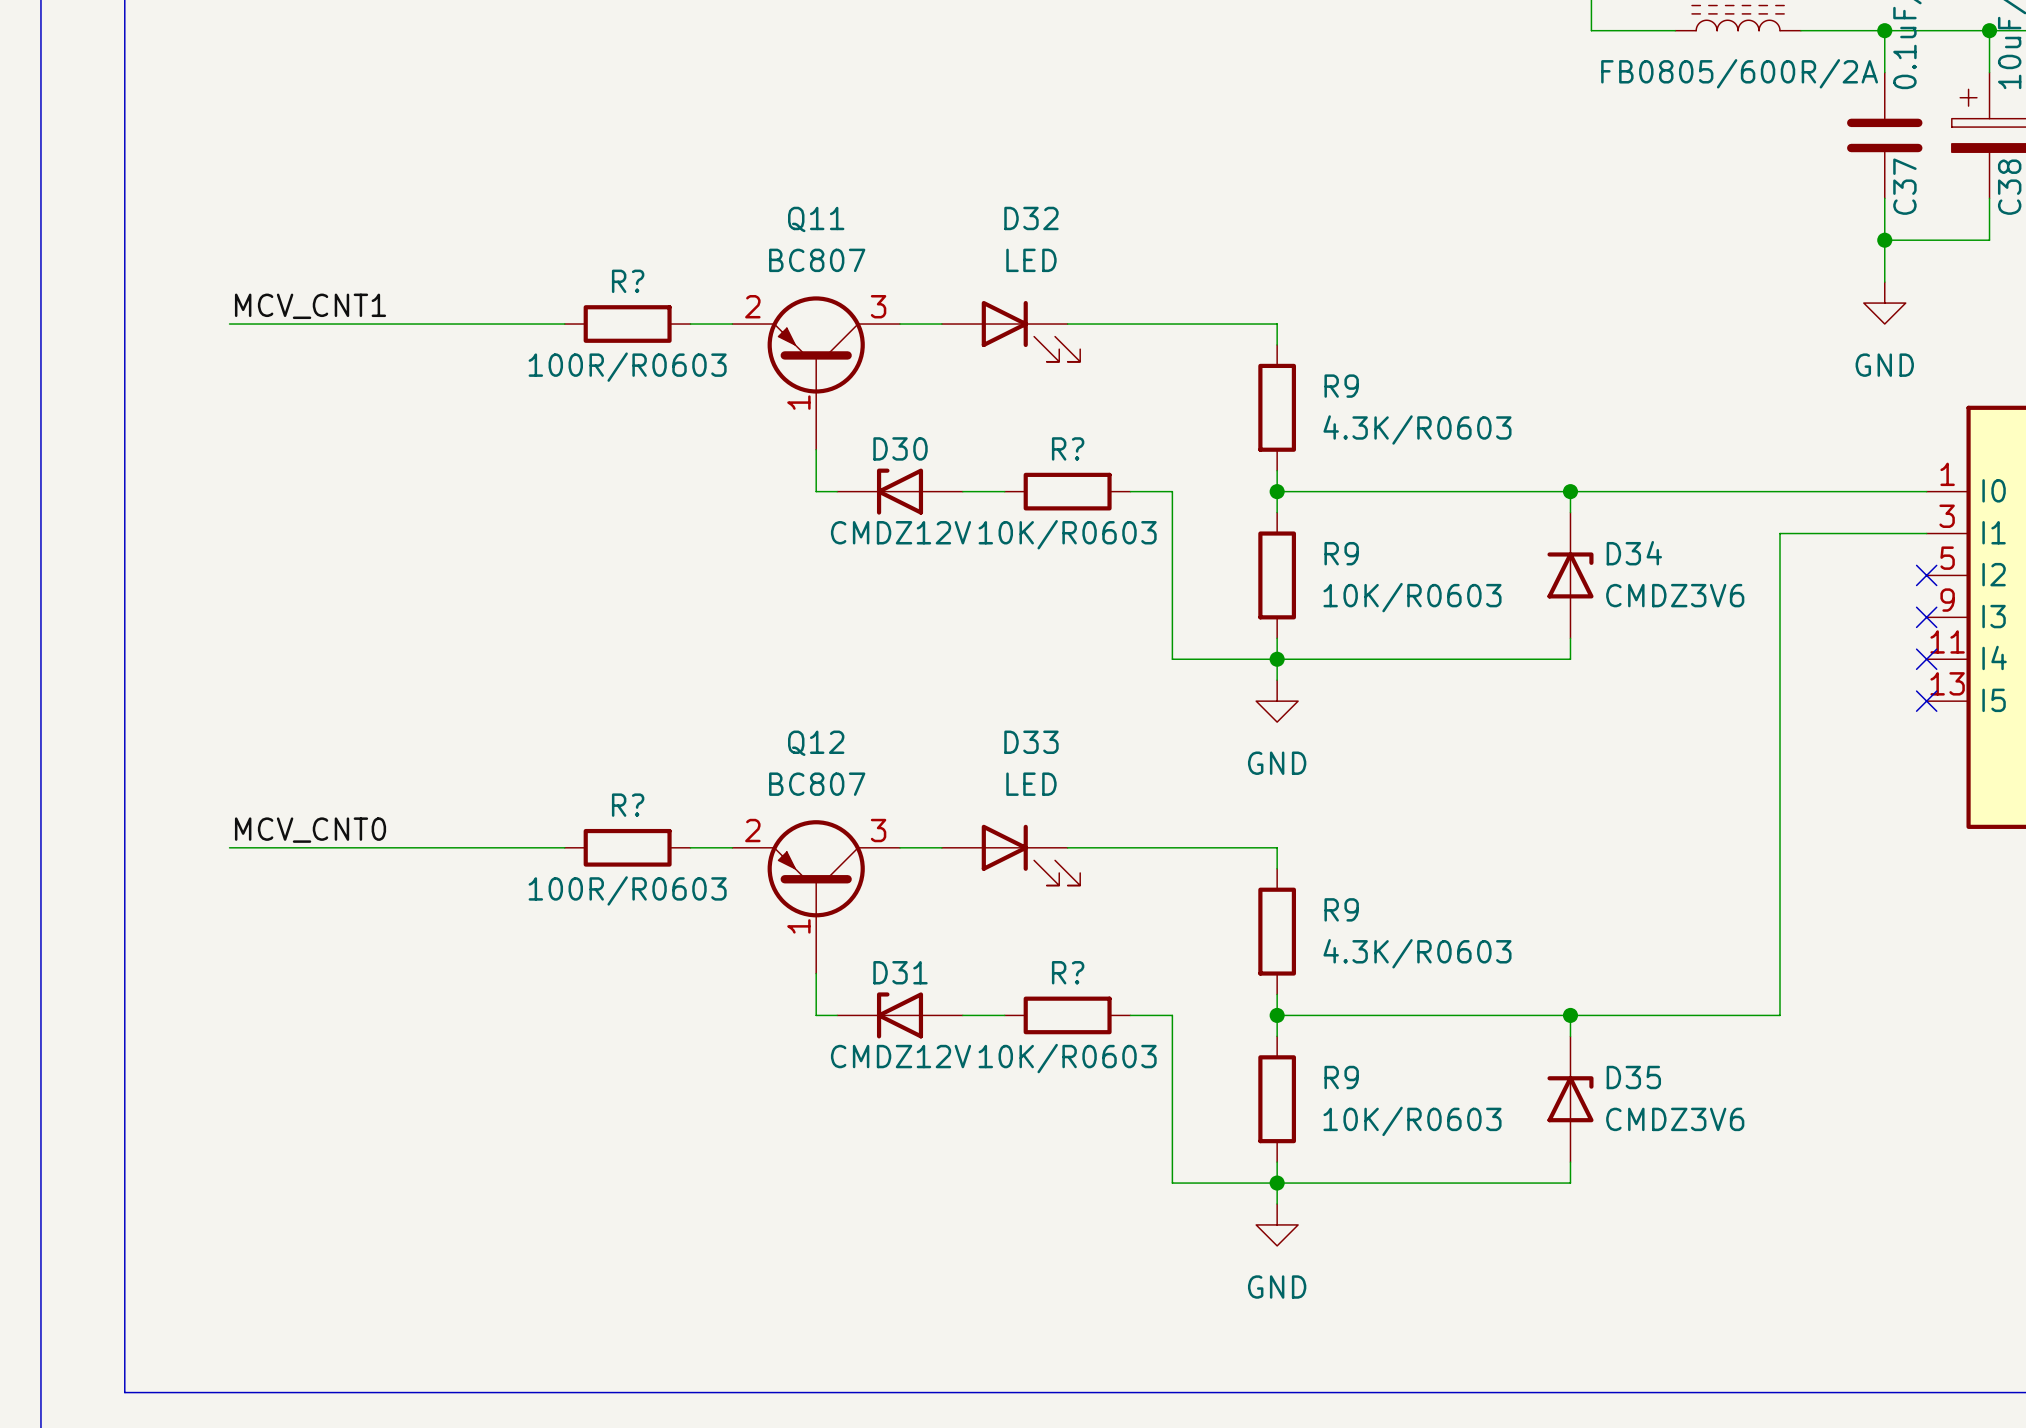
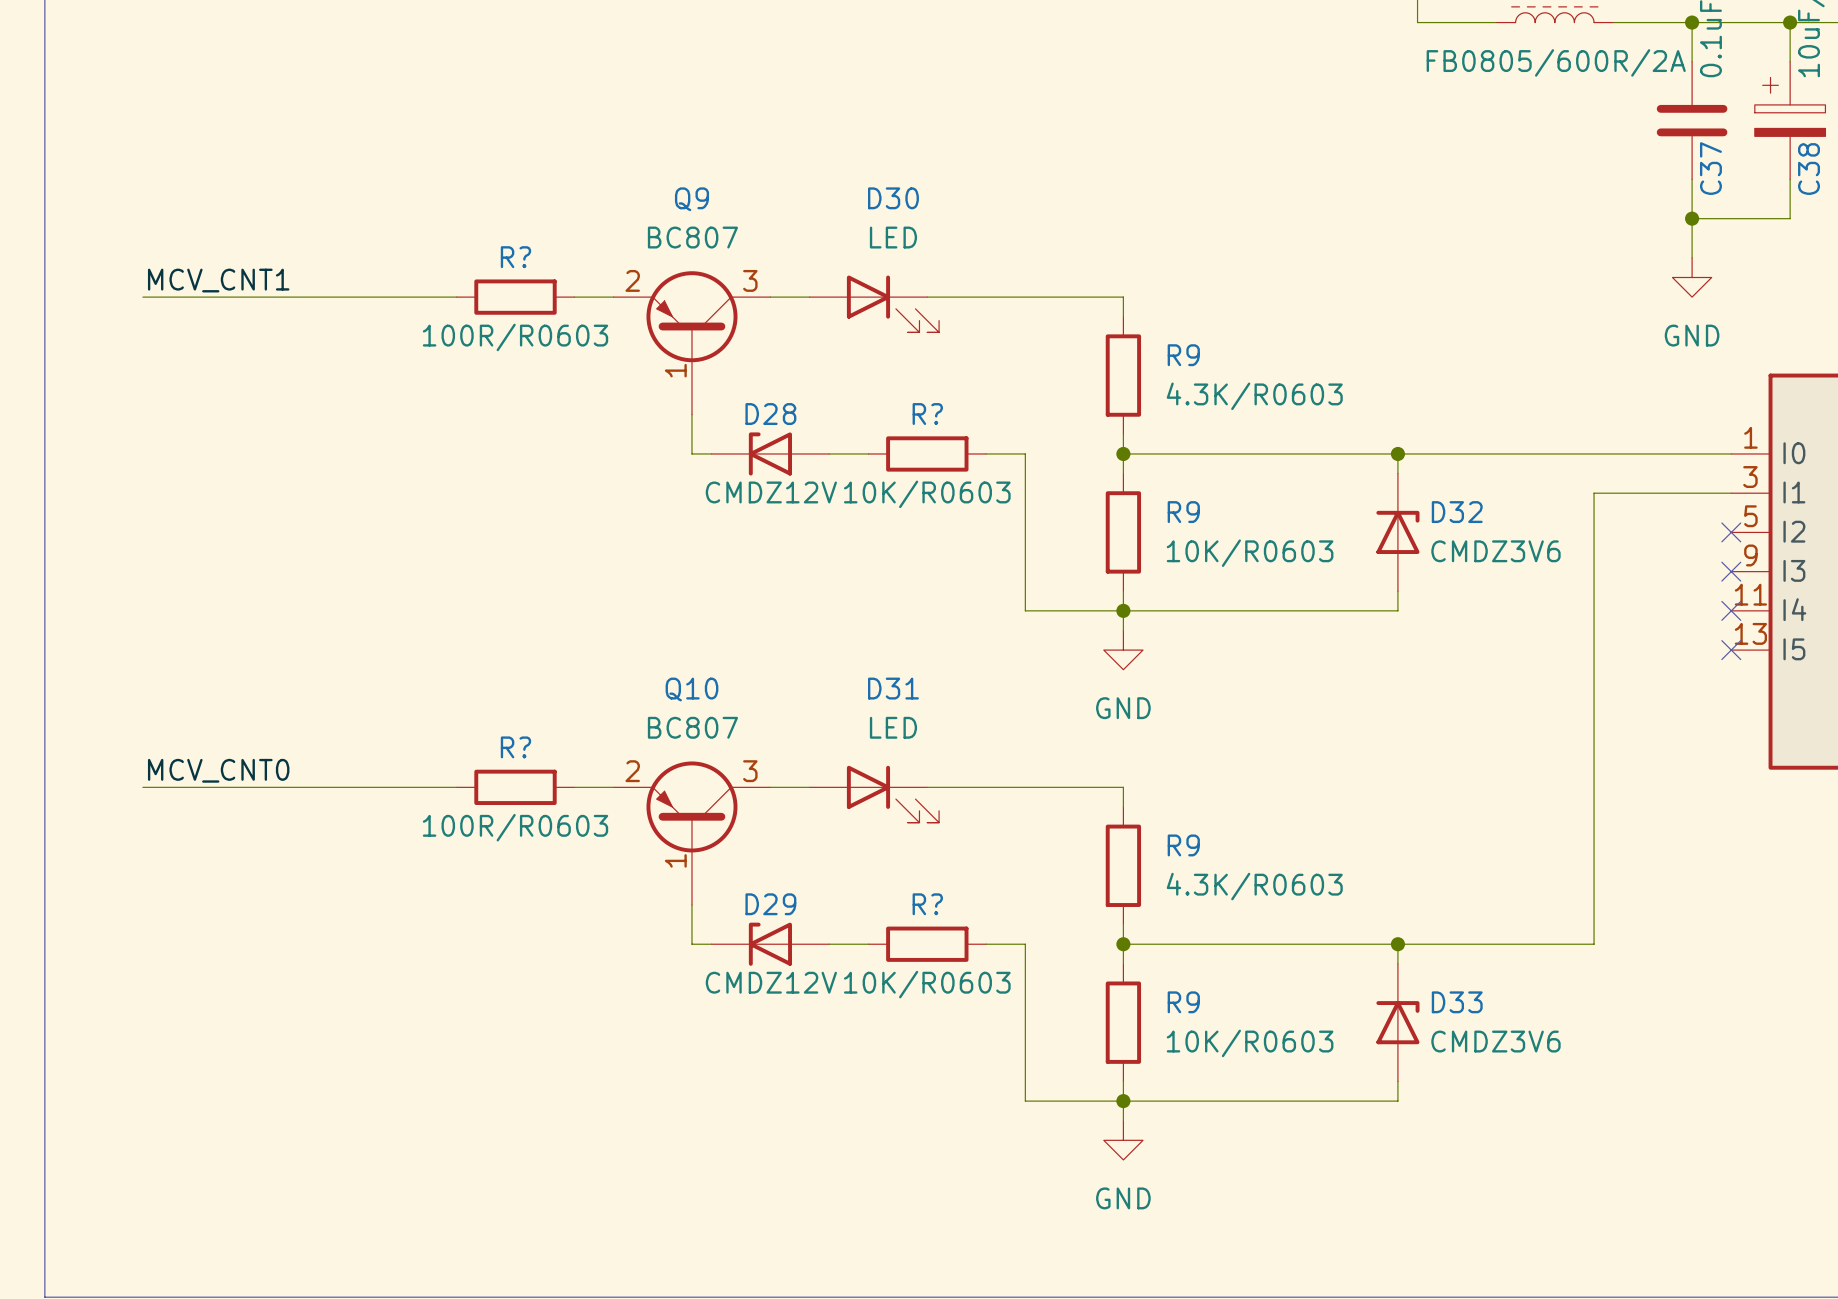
D32 name: D32 (1031, 218) -> D30 (893, 198)
Q11 name: Q11 (816, 219) -> Q9 (691, 199)
D30 name: D30 (900, 448) -> D28 (770, 414)
D34 name: D34 (1634, 553) -> D32 (1457, 512)
D33 name: D33 (1031, 742) -> D31 (893, 688)
Q12 name: Q12 (816, 743) -> Q10 (691, 689)
D31 name: D31 (900, 972) -> D29 (770, 904)
D35 name: D35 (1633, 1077) -> D33 (1457, 1002)

